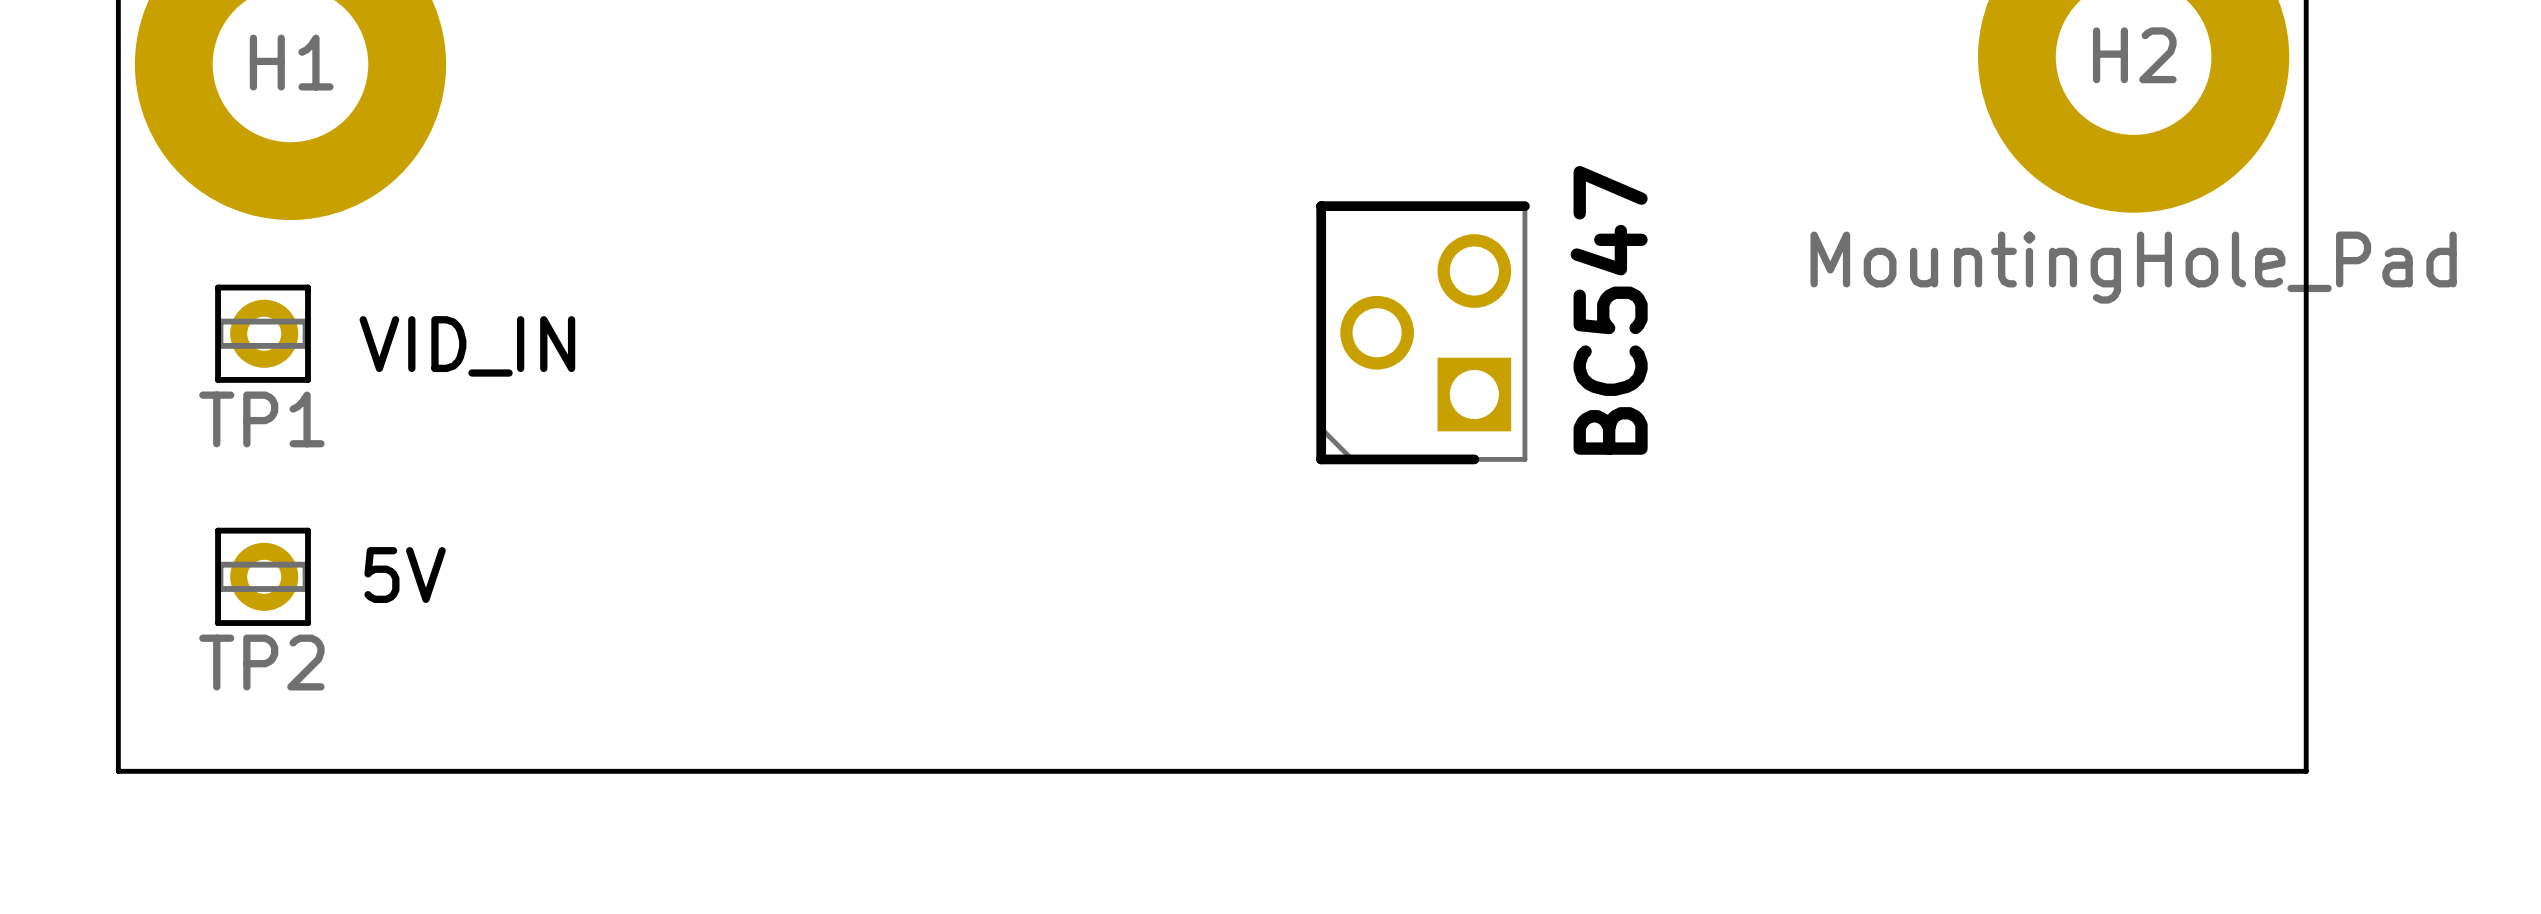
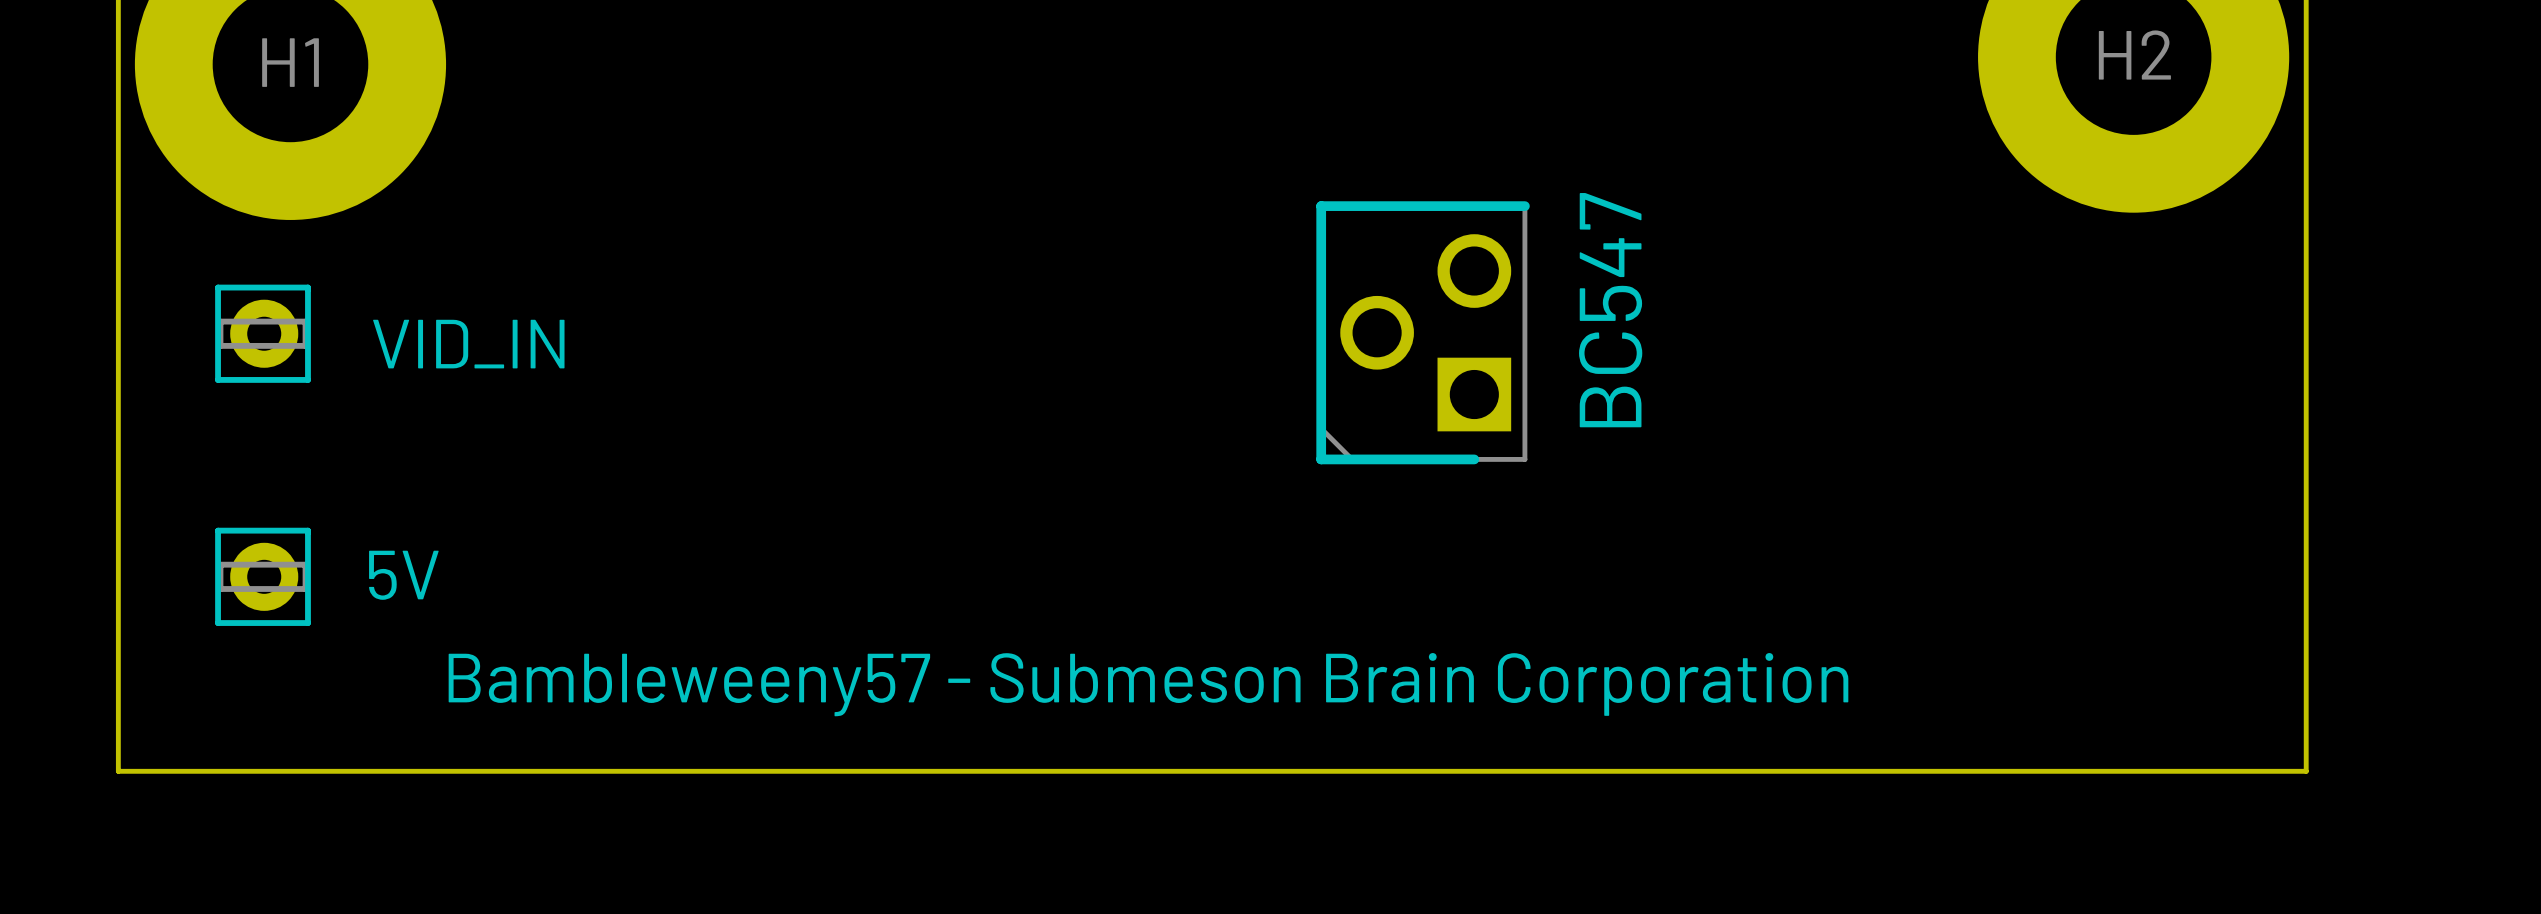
H2 value: MountingHole_Pad (2133, 267) -> none
TP1 name: TP1 (261, 419) -> none
TP2 name: TP2 (261, 662) -> none
text: none -> Bambleweeny57 - Submeson Brain Corporation (1148, 684)

